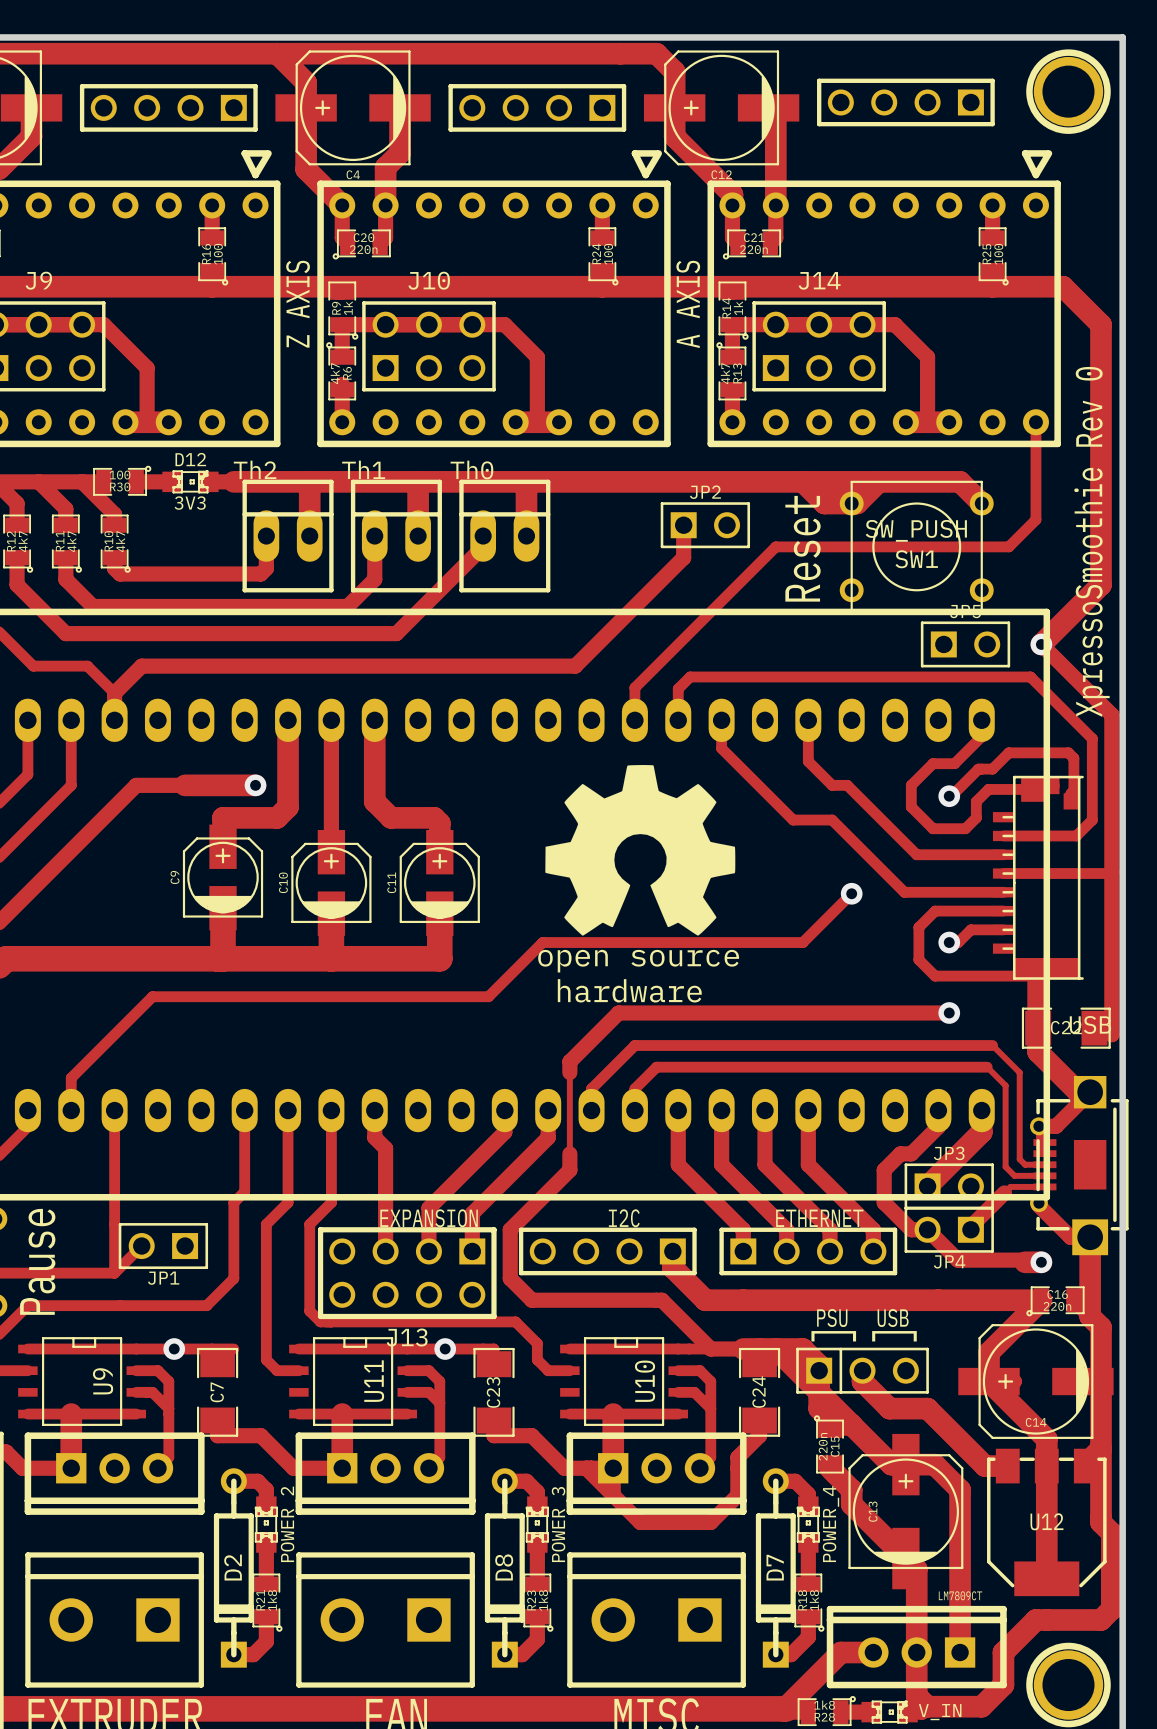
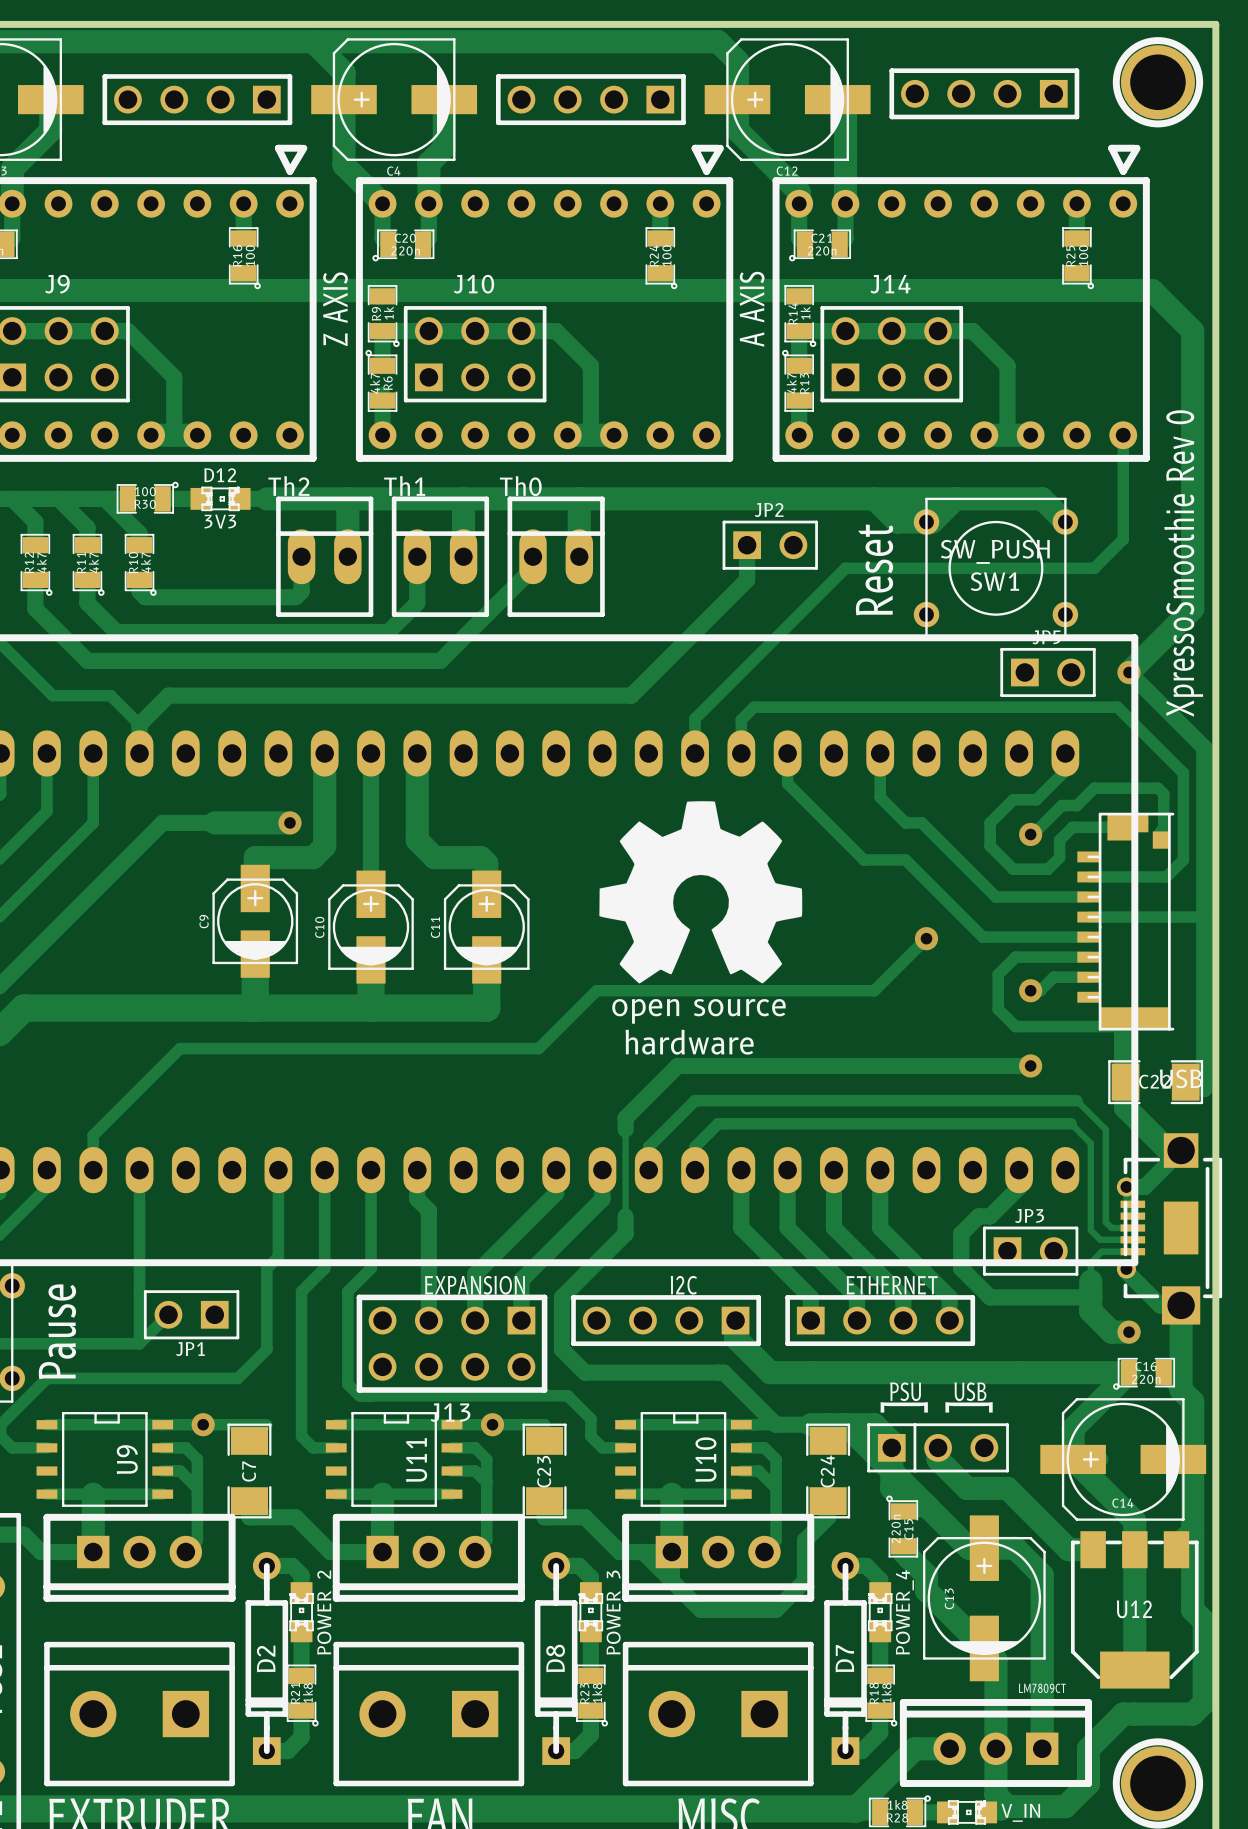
track: (981, 1110) (981, 1132) (927, 1186) -> none
track: (1015, 1186) (1010, 1186) (970, 1226) (970, 1229) -> (1101, 1251) (1090, 1262) (1090, 1311) (1109, 1329)
track: (927, 1229) (957, 1260) (1022, 1260) -> (1007, 1297) (1090, 1297)
JP4: (949, 1229) -> none

